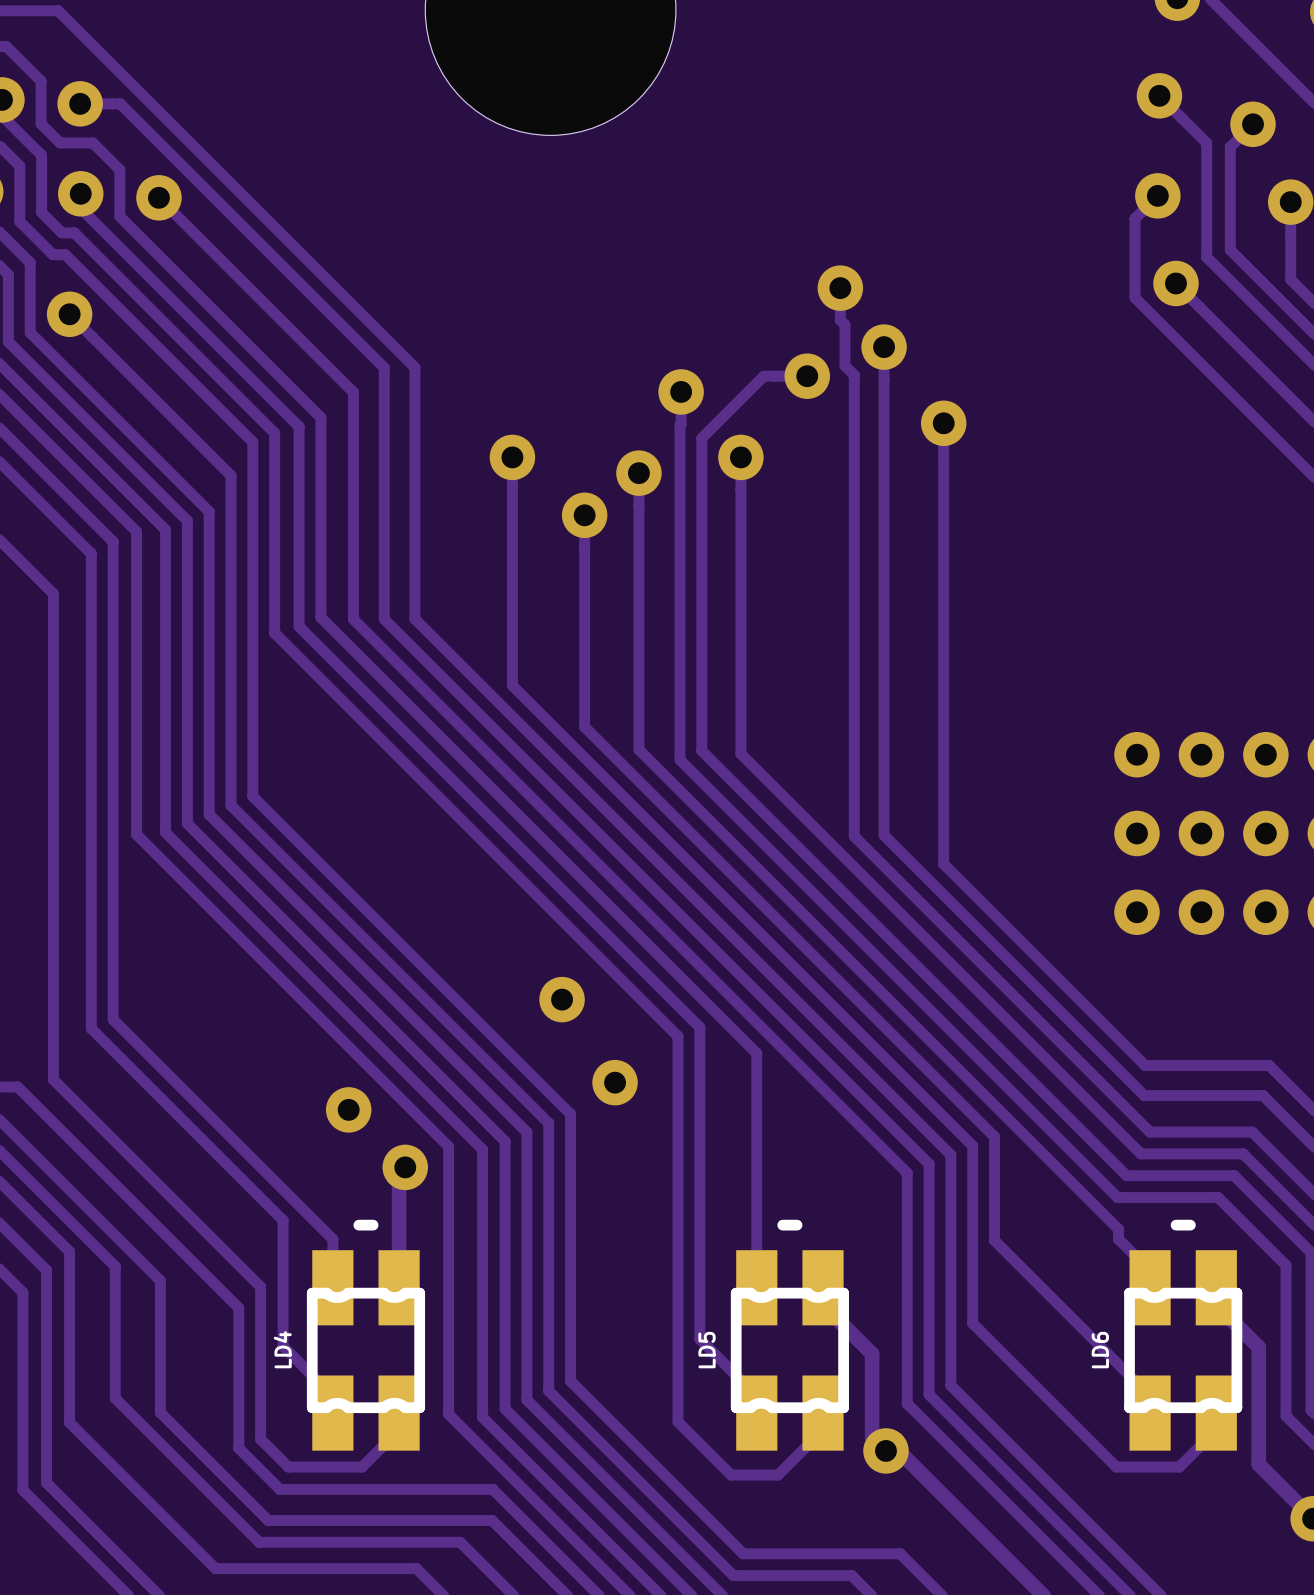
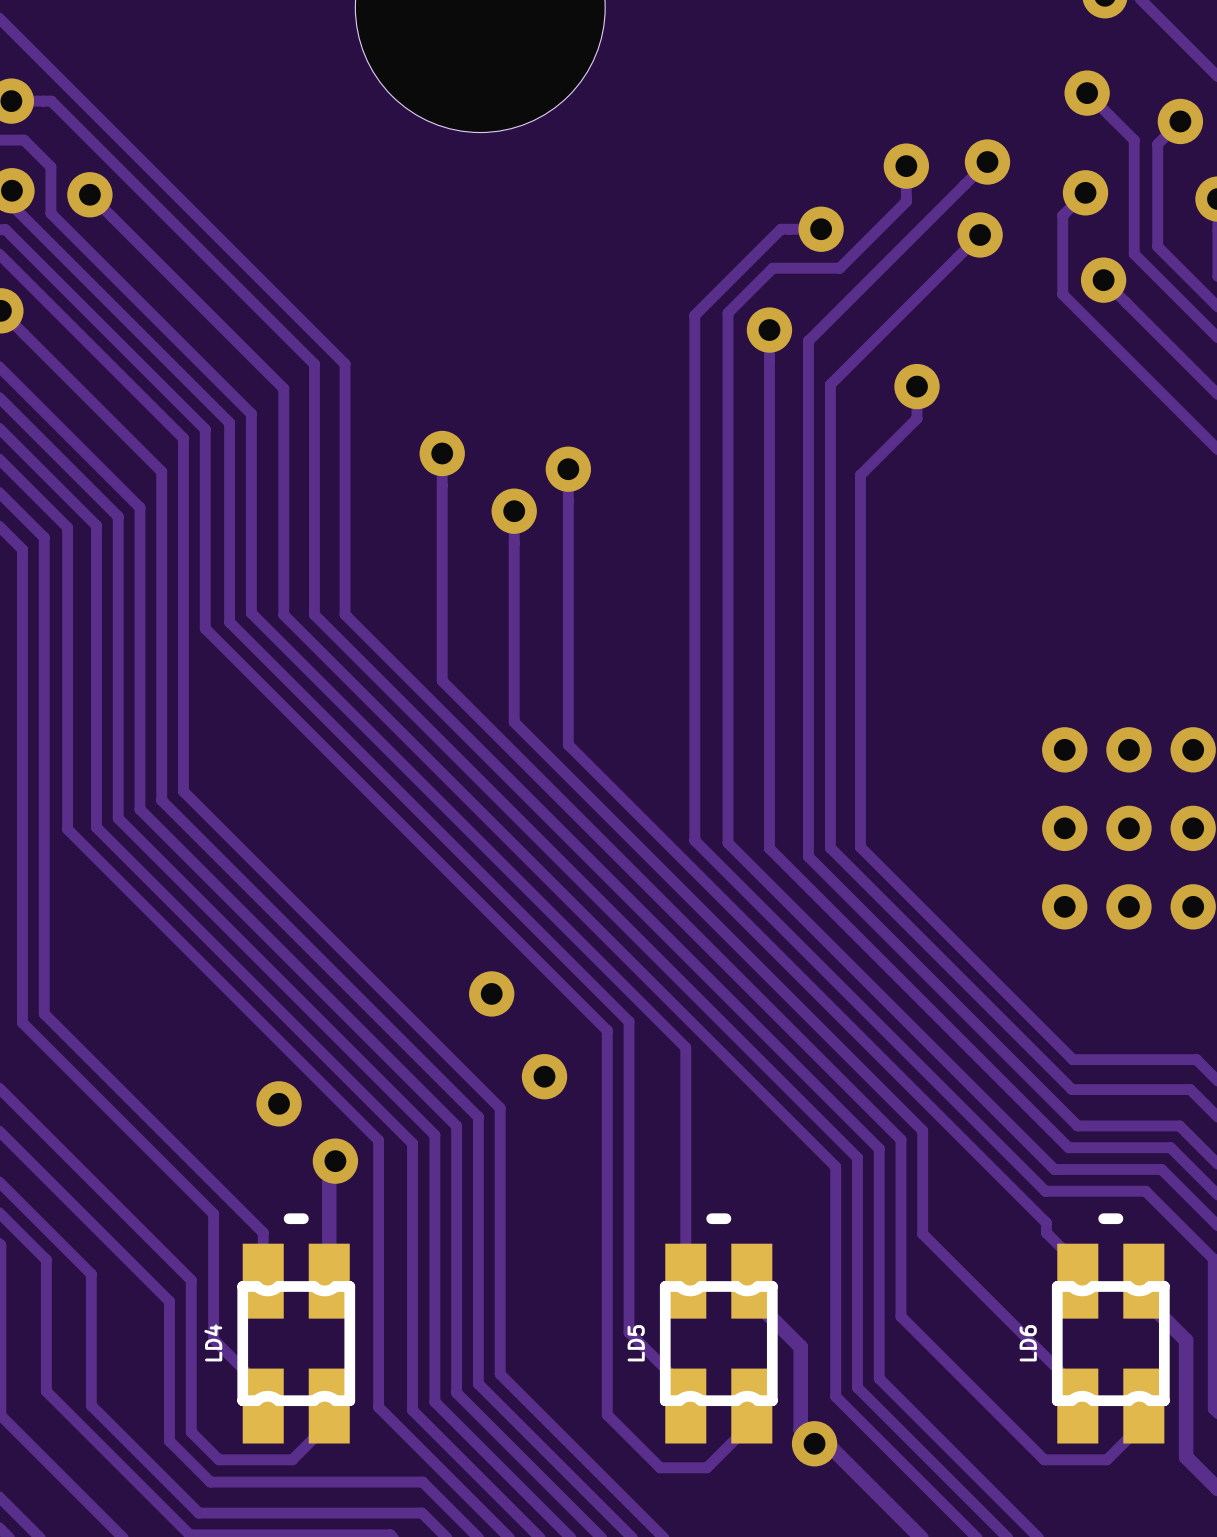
via: none -> (987, 162)
via: none -> (906, 166)
via: none -> (821, 229)
via: none -> (980, 234)
track: (840, 288) (840, 320) (844, 324) (844, 365) (854, 375) (854, 836) (879, 861) -> (987, 162) (808, 341) (808, 856)
via: (840, 288) -> none
via: none -> (769, 330)
track: (884, 347) (884, 835) (901, 853) -> (980, 234) (830, 384) (830, 847)
via: (884, 347) -> none
track: (807, 376) (763, 376) (701, 438) (701, 750) (799, 848) -> (906, 166) (906, 201) (839, 268) (772, 268) (728, 312) (728, 843)
via: (807, 376) -> none
track: (681, 391) (679, 759) (765, 845) -> (821, 229) (781, 229) (694, 315) (694, 840)
via: (681, 391) -> none
track: (943, 423) (943, 864) -> (917, 386) (917, 418) (860, 475) (860, 847) (872, 858)
via position: (943, 423) -> (917, 386)
track: (740, 457) (740, 753) (840, 853) -> (769, 330) (769, 848)
via: (740, 457) -> none

